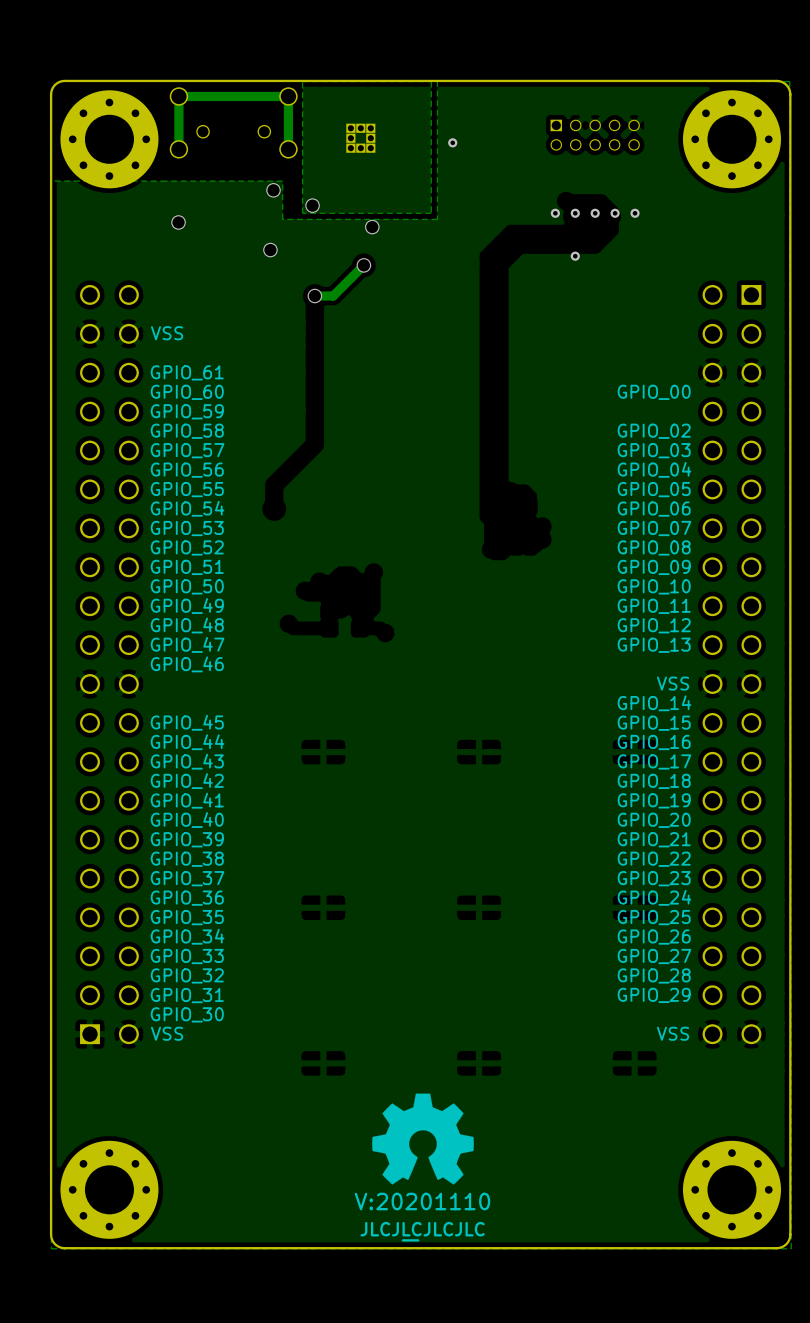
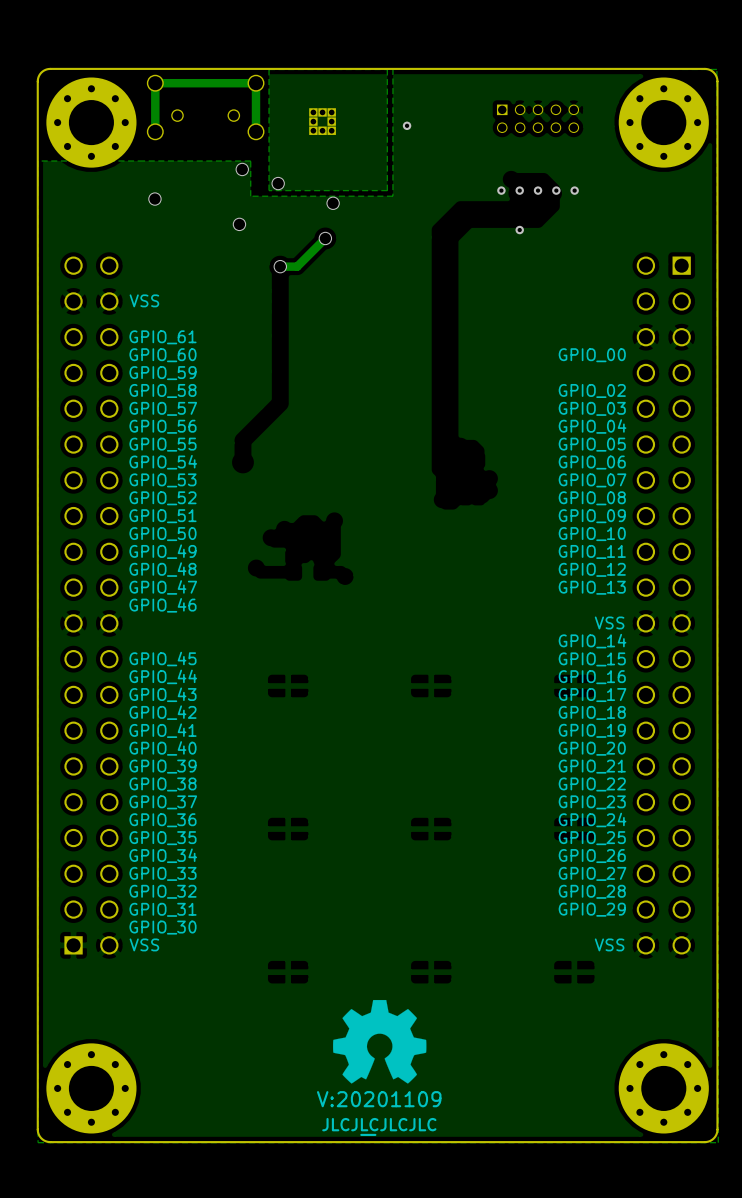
drawing shape: [354, 1192, 491, 1211] -> [316, 1091, 442, 1108]

